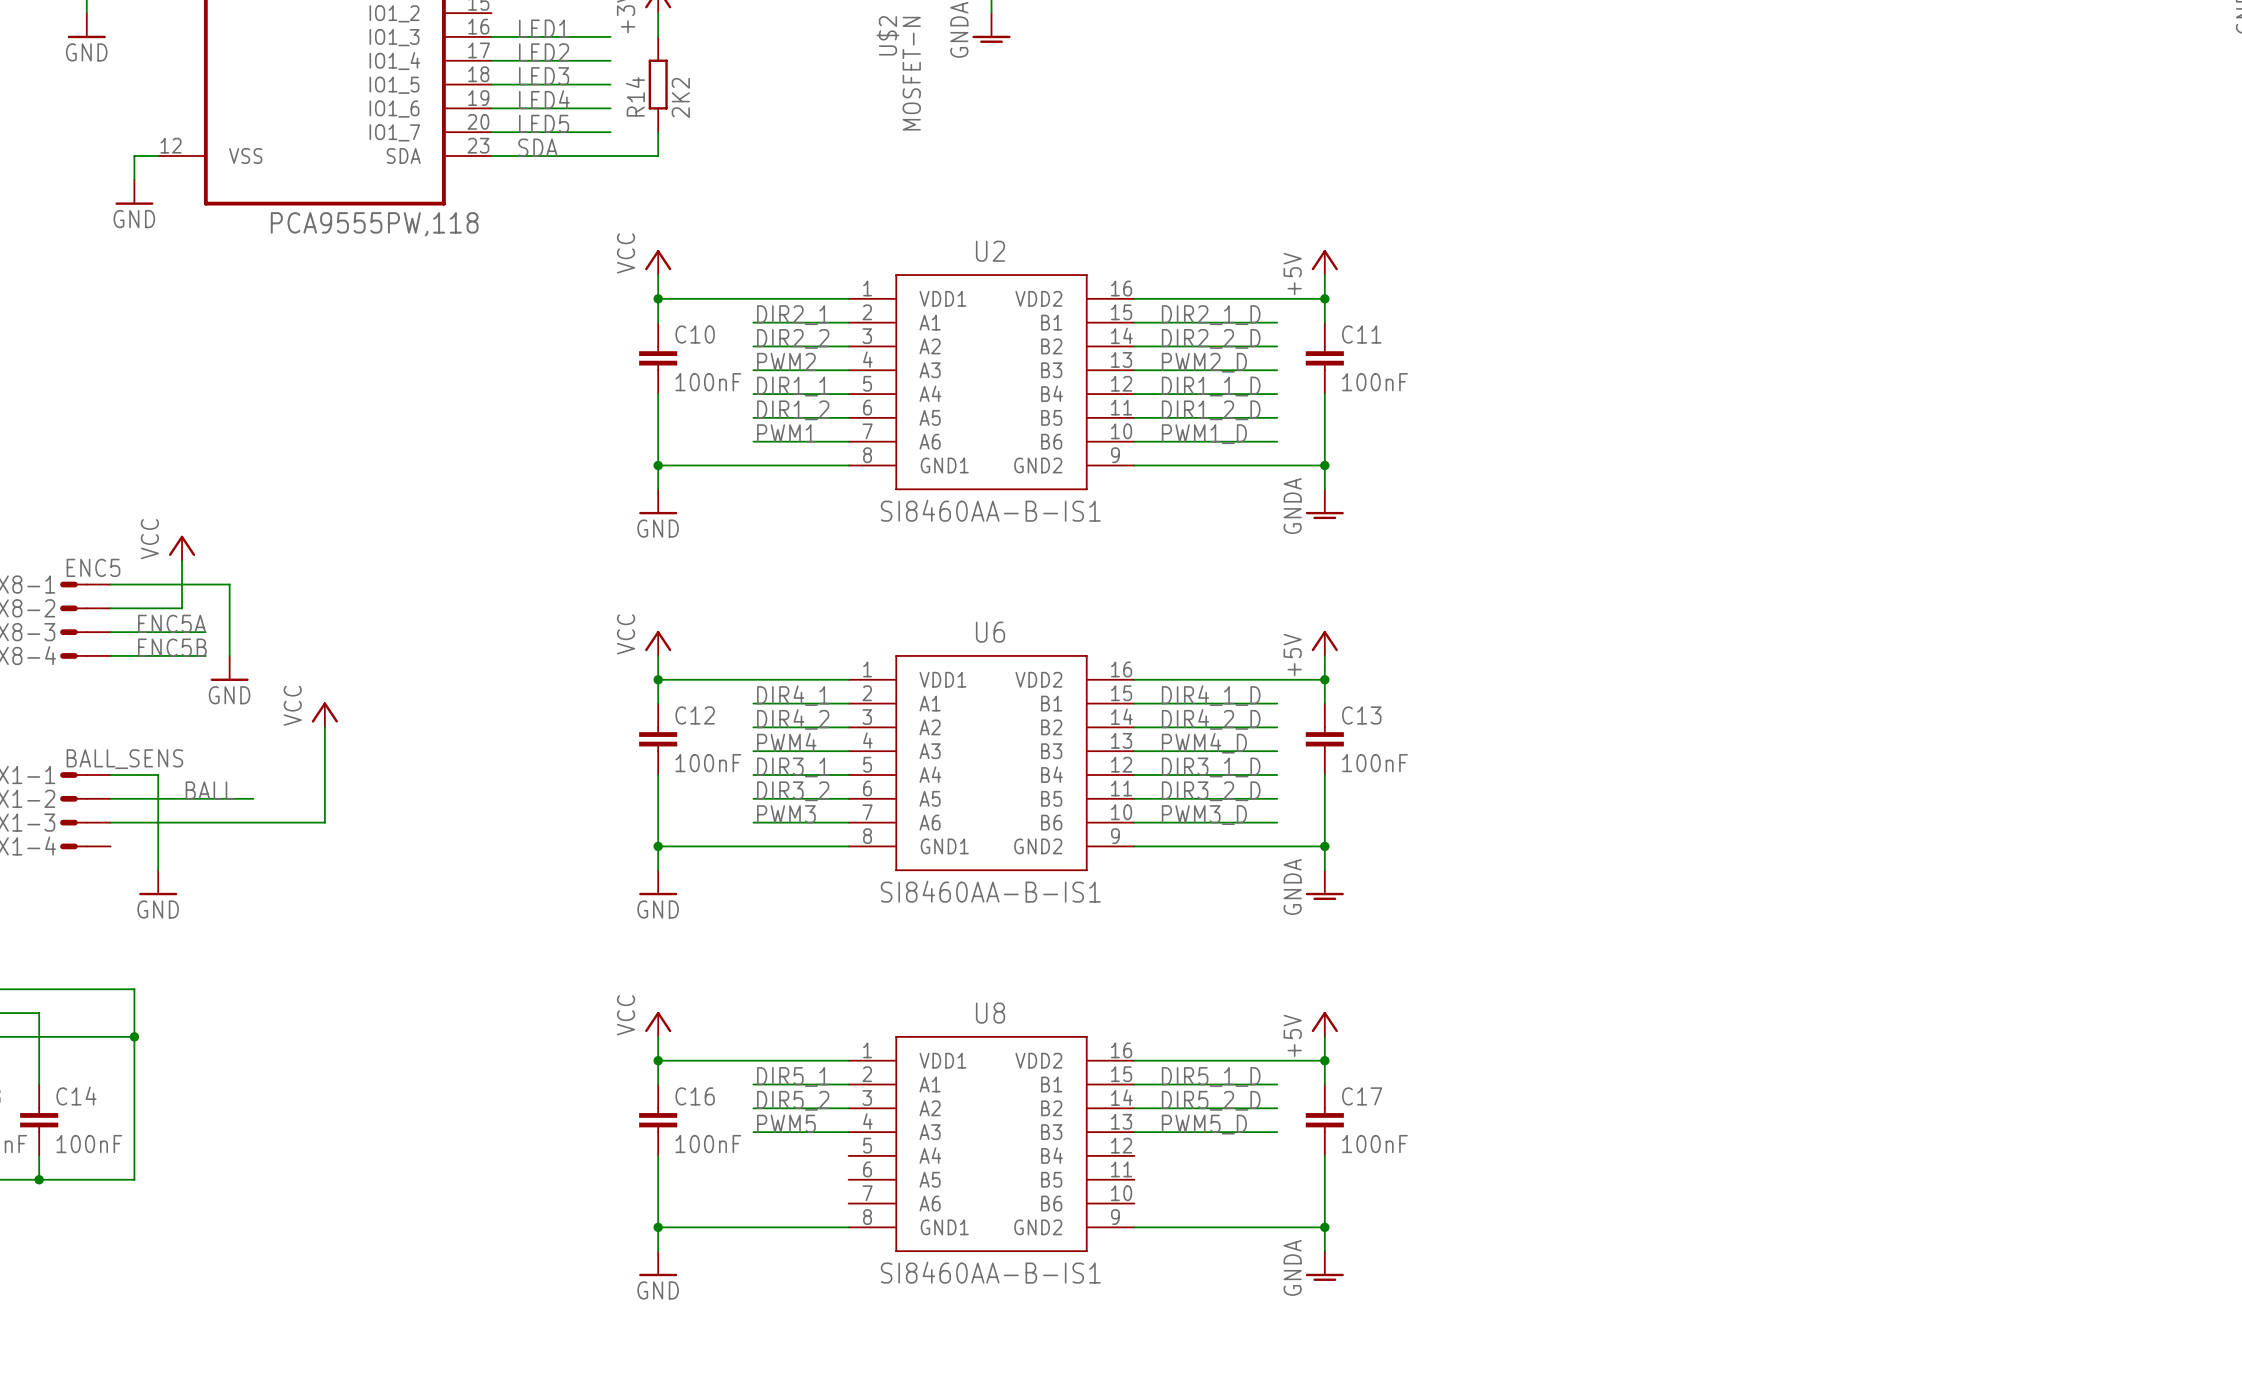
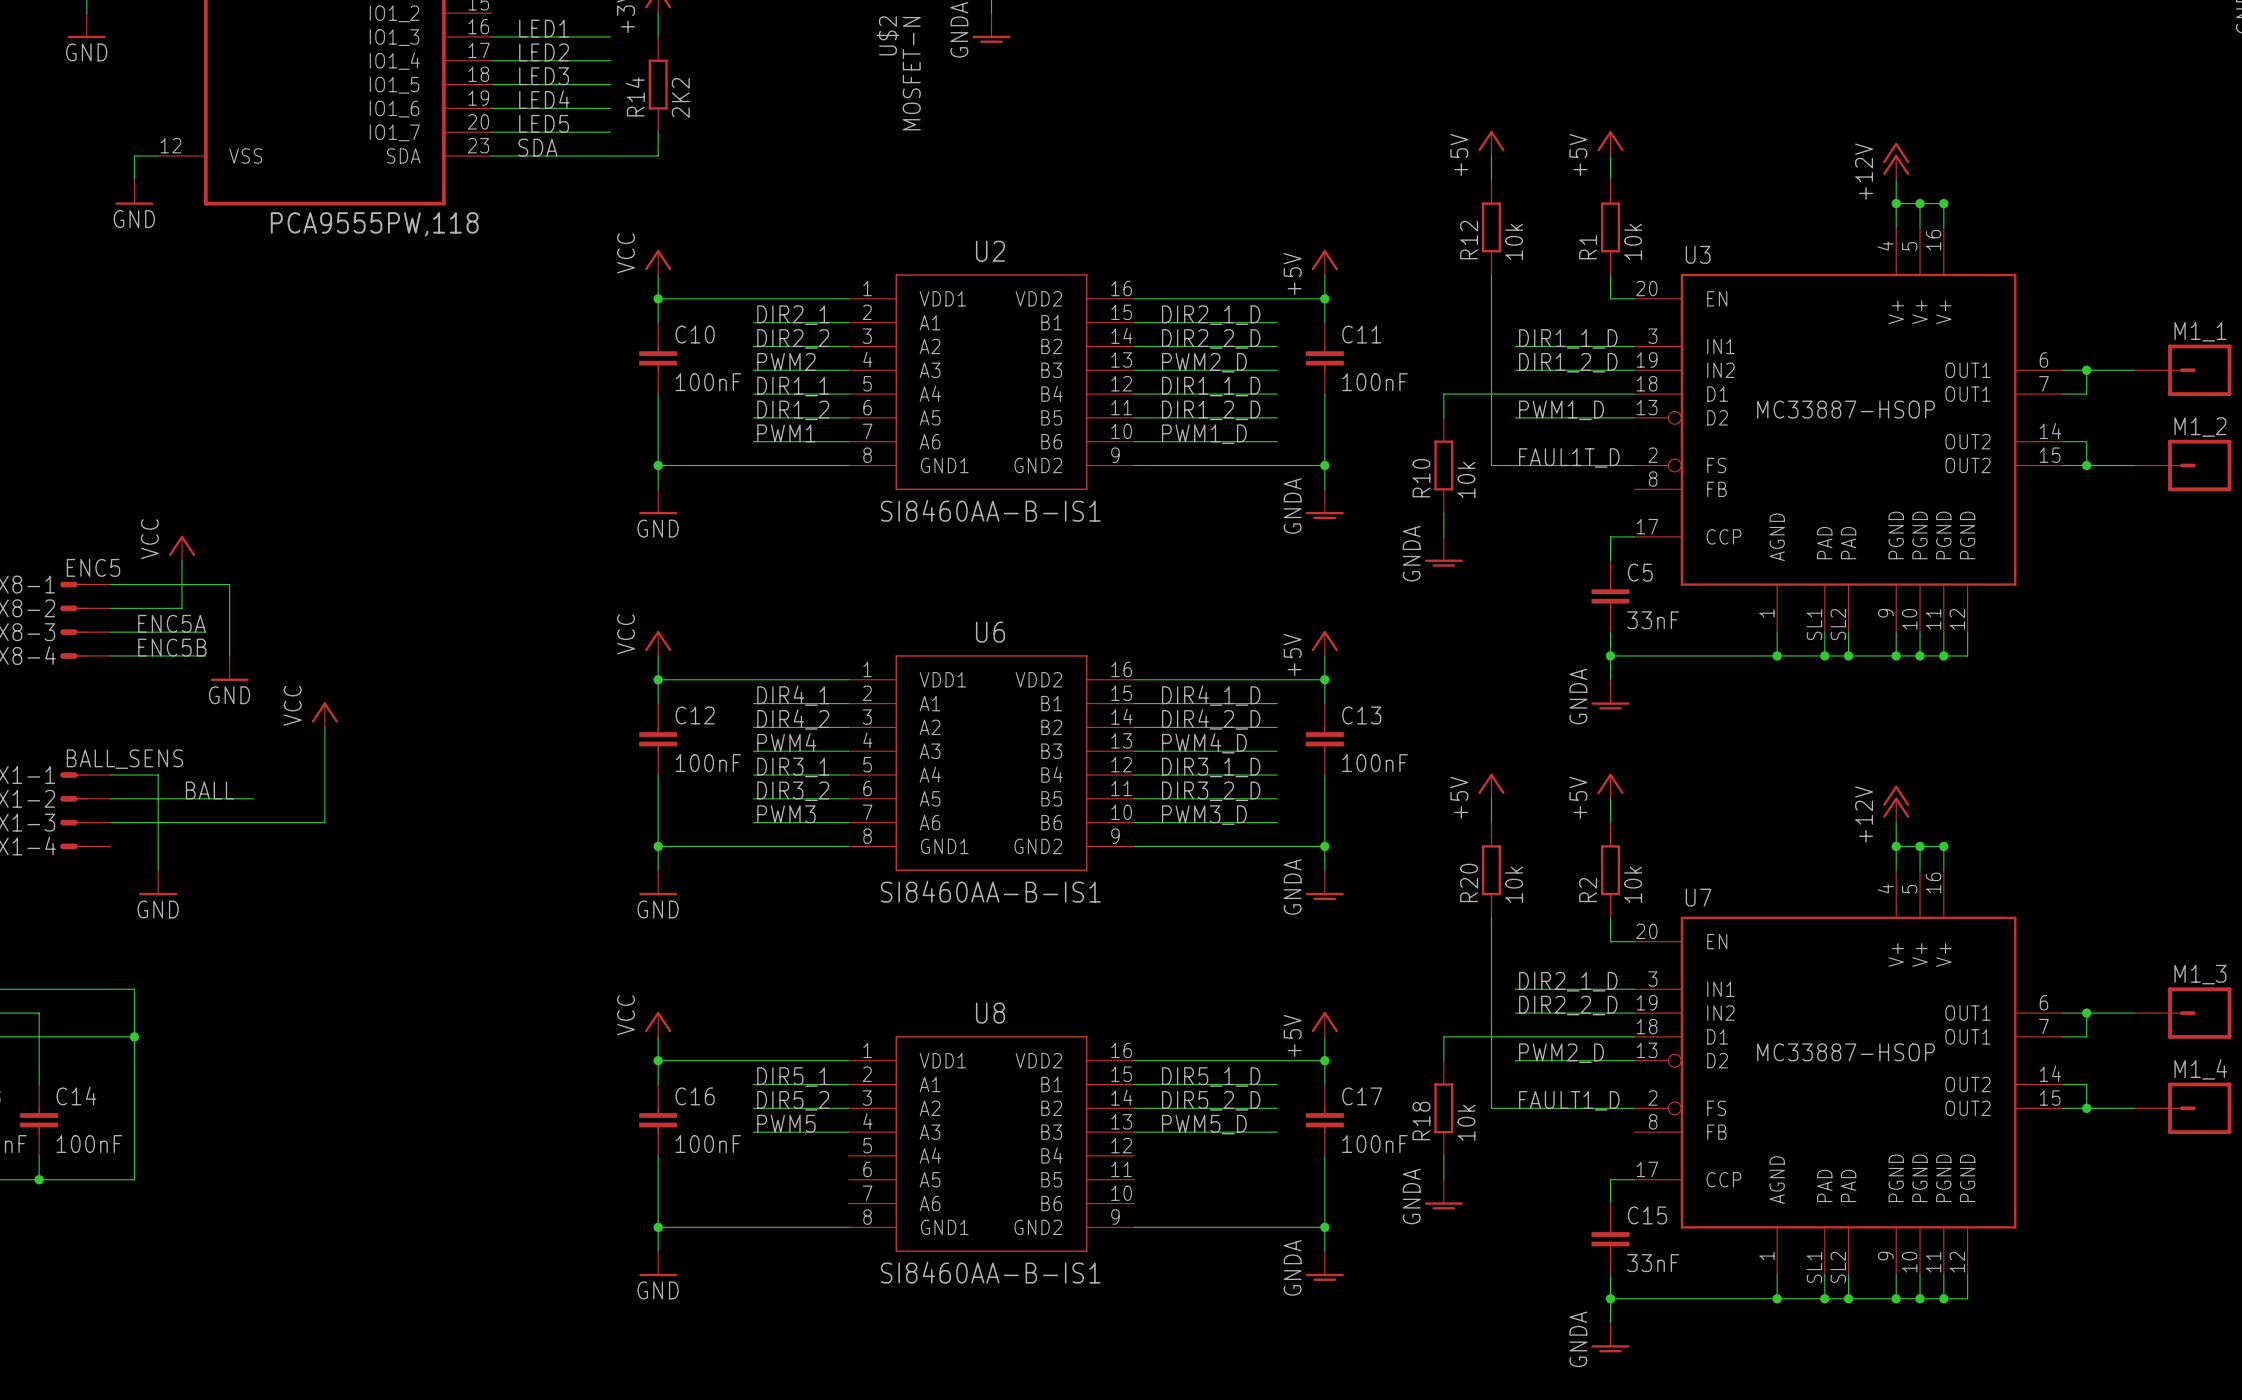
power symbol: none -> +5V (1491, 143)
power symbol: none -> +5V (1610, 143)
wire: none -> (1491, 155) (1491, 179)
wire: none -> (1610, 155) (1610, 179)
power symbol: none -> +12V (1896, 161)
wire: none -> (1896, 179) (1896, 227)
wire: none -> (1896, 203) (1943, 203) (1943, 227)
junction: none -> (1896, 203)
wire: none -> (1920, 203) (1920, 227)
junction: none -> (1920, 203)
junction: none -> (1943, 203)
R12: none -> 10k (1491, 227)
R1: none -> 10k (1610, 227)
wire: none -> (1491, 275) (1491, 465) (1634, 465)
wire: none -> (1610, 275) (1610, 298) (1634, 298)
label: none -> DIR1_1_D (1568, 338)
wire: none -> (1515, 346) (1634, 346)
label: none -> DIR1_2_D (1568, 362)
wire: none -> (1515, 370) (1634, 370)
wire: none -> (2062, 370) (2134, 370)
wire: none -> (2086, 370) (2086, 394) (2062, 394)
junction: none -> (2086, 370)
M1_1: none -> (2182, 370)
wire: none -> (1634, 394) (1443, 394) (1443, 417)
label: none -> PWM1_D (1561, 410)
wire: none -> (1515, 417) (1634, 417)
U3: none -> MC33887-HSOP (1848, 429)
wire: none -> (2062, 441) (2086, 441) (2086, 465)
label: none -> FAUL1T_D (1569, 457)
R10: none -> 10k (1443, 465)
wire: none -> (2062, 465) (2134, 465)
junction: none -> (2086, 465)
M1_2: none -> (2182, 465)
wire: none -> (1443, 513) (1443, 536)
wire: none -> (1634, 536) (1610, 536) (1610, 560)
power symbol: none -> GNDA (1443, 551)
C5: none -> 33nF (1610, 596)
wire: none -> (1610, 632) (1610, 679)
wire: none -> (1777, 632) (1777, 655)
wire: none -> (1824, 632) (1824, 655)
wire: none -> (1848, 632) (1848, 655)
wire: none -> (1896, 632) (1896, 655)
wire: none -> (1920, 632) (1920, 655)
wire: none -> (1943, 632) (1943, 655)
wire: none -> (1967, 632) (1967, 655) (1610, 655)
junction: none -> (1610, 655)
junction: none -> (1777, 655)
junction: none -> (1824, 655)
junction: none -> (1848, 655)
junction: none -> (1896, 655)
junction: none -> (1920, 655)
junction: none -> (1943, 655)
power symbol: none -> GNDA (1610, 694)
power symbol: none -> +5V (1491, 786)
power symbol: none -> +5V (1610, 786)
wire: none -> (1491, 798) (1491, 822)
wire: none -> (1610, 798) (1610, 822)
power symbol: none -> +12V (1896, 804)
wire: none -> (1896, 822) (1896, 870)
wire: none -> (1896, 846) (1943, 846) (1943, 870)
junction: none -> (1896, 846)
wire: none -> (1920, 846) (1920, 870)
junction: none -> (1920, 846)
junction: none -> (1943, 846)
R20: none -> 10k (1491, 870)
R2: none -> 10k (1610, 870)
wire: none -> (1491, 917) (1491, 1108) (1634, 1108)
wire: none -> (1610, 917) (1610, 941) (1634, 941)
label: none -> DIR2_1_D (1568, 981)
wire: none -> (1515, 989) (1634, 989)
label: none -> DIR2_2_D (1568, 1005)
wire: none -> (1515, 1013) (1634, 1013)
wire: none -> (2062, 1013) (2134, 1013)
wire: none -> (2086, 1013) (2086, 1036) (2062, 1036)
junction: none -> (2086, 1013)
M1_3: none -> (2182, 1013)
wire: none -> (1634, 1036) (1443, 1036) (1443, 1060)
label: none -> PWM2_D (1561, 1053)
wire: none -> (1515, 1060) (1634, 1060)
U7: none -> MC33887-HSOP (1848, 1072)
wire: none -> (2062, 1084) (2086, 1084) (2086, 1108)
label: none -> FAULT1_D (1569, 1100)
R18: none -> 10k (1443, 1108)
wire: none -> (2062, 1108) (2134, 1108)
junction: none -> (2086, 1108)
M1_4: none -> (2182, 1108)
wire: none -> (1443, 1155) (1443, 1179)
wire: none -> (1634, 1179) (1610, 1179) (1610, 1203)
power symbol: none -> GNDA (1443, 1194)
C15: none -> 33nF (1610, 1239)
wire: none -> (1610, 1274) (1610, 1322)
wire: none -> (1777, 1274) (1777, 1298)
wire: none -> (1824, 1274) (1824, 1298)
wire: none -> (1848, 1274) (1848, 1298)
wire: none -> (1896, 1274) (1896, 1298)
wire: none -> (1920, 1274) (1920, 1298)
wire: none -> (1943, 1274) (1943, 1298)
wire: none -> (1967, 1274) (1967, 1298) (1610, 1298)
junction: none -> (1610, 1298)
junction: none -> (1777, 1298)
junction: none -> (1824, 1298)
junction: none -> (1848, 1298)
junction: none -> (1896, 1298)
junction: none -> (1920, 1298)
junction: none -> (1943, 1298)
power symbol: none -> GNDA (1610, 1337)

